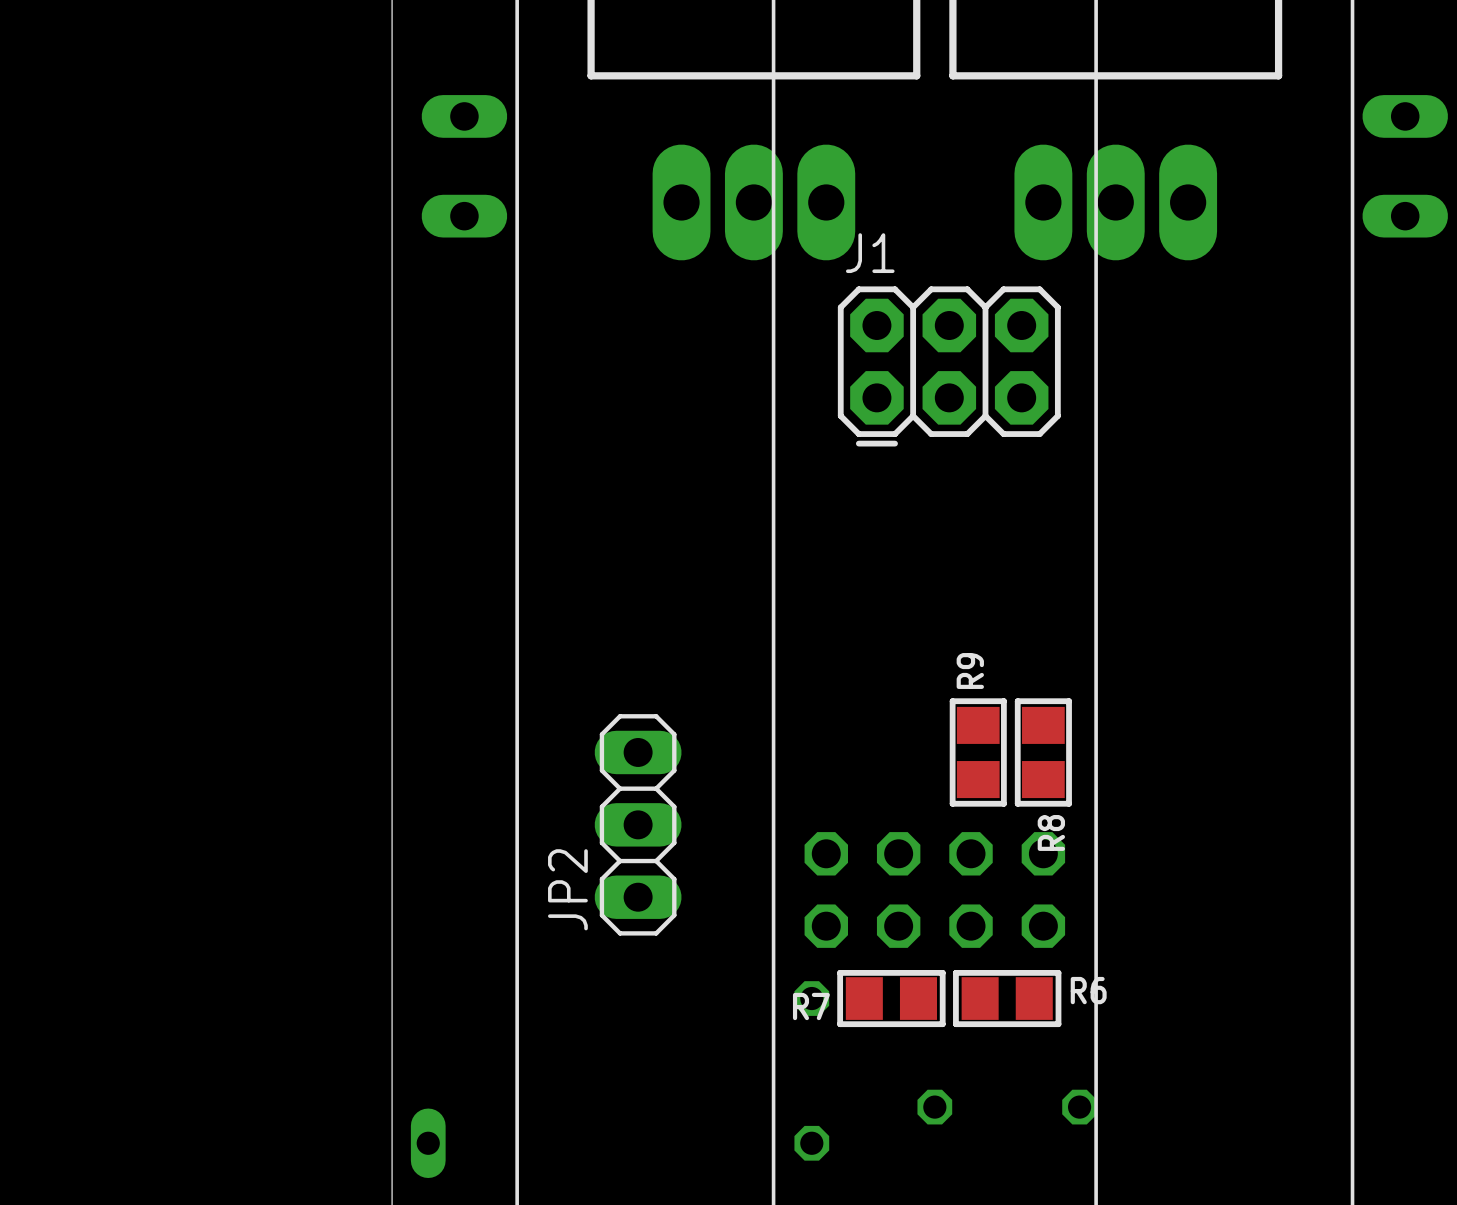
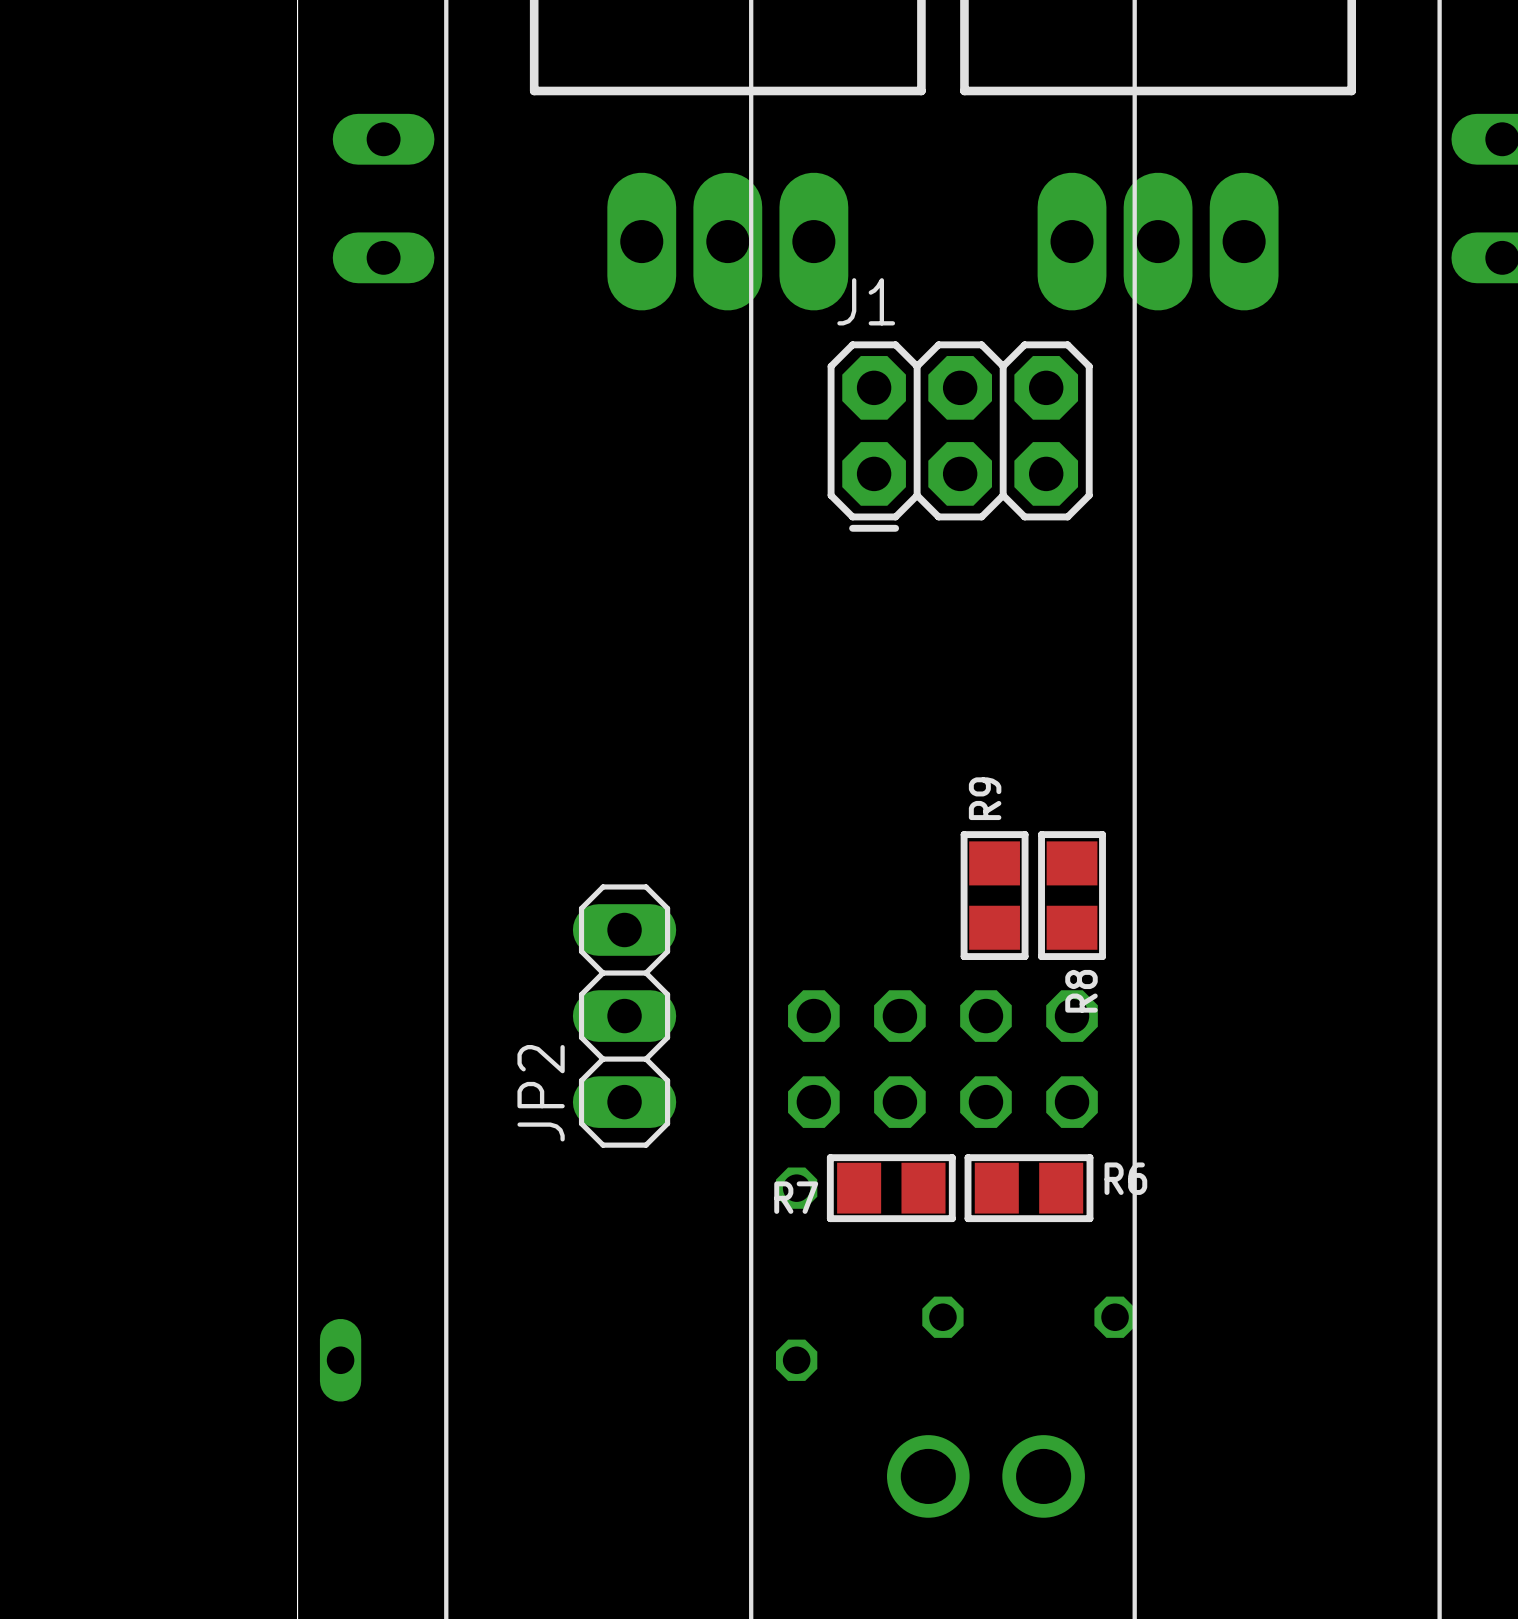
JP2 position: (638, 824) -> (624, 1016)

